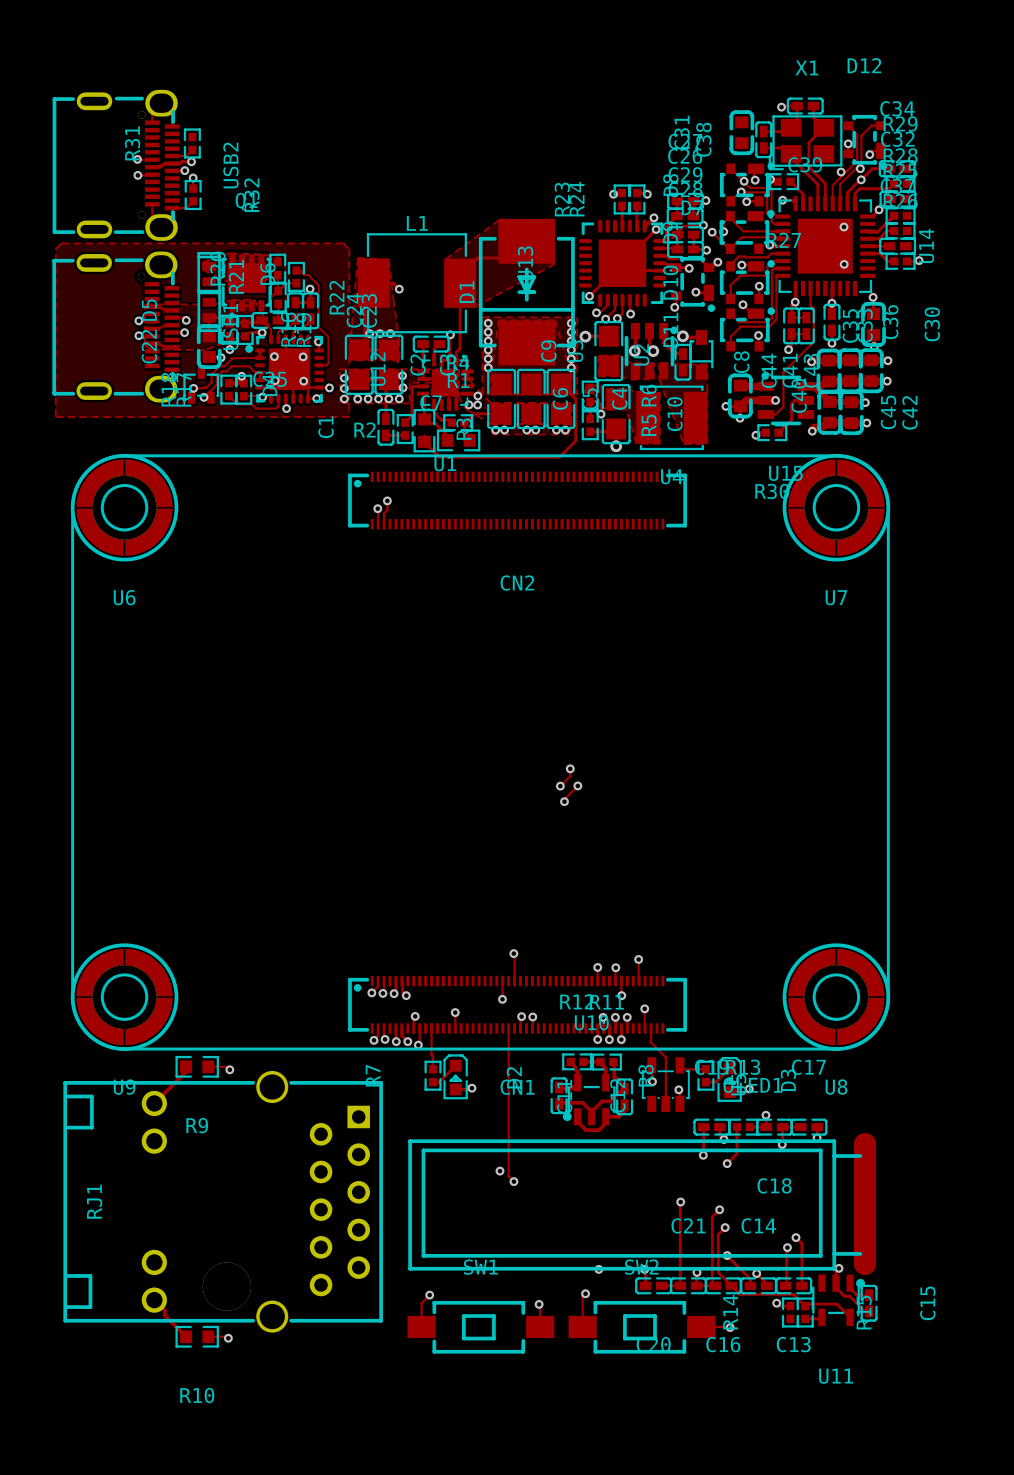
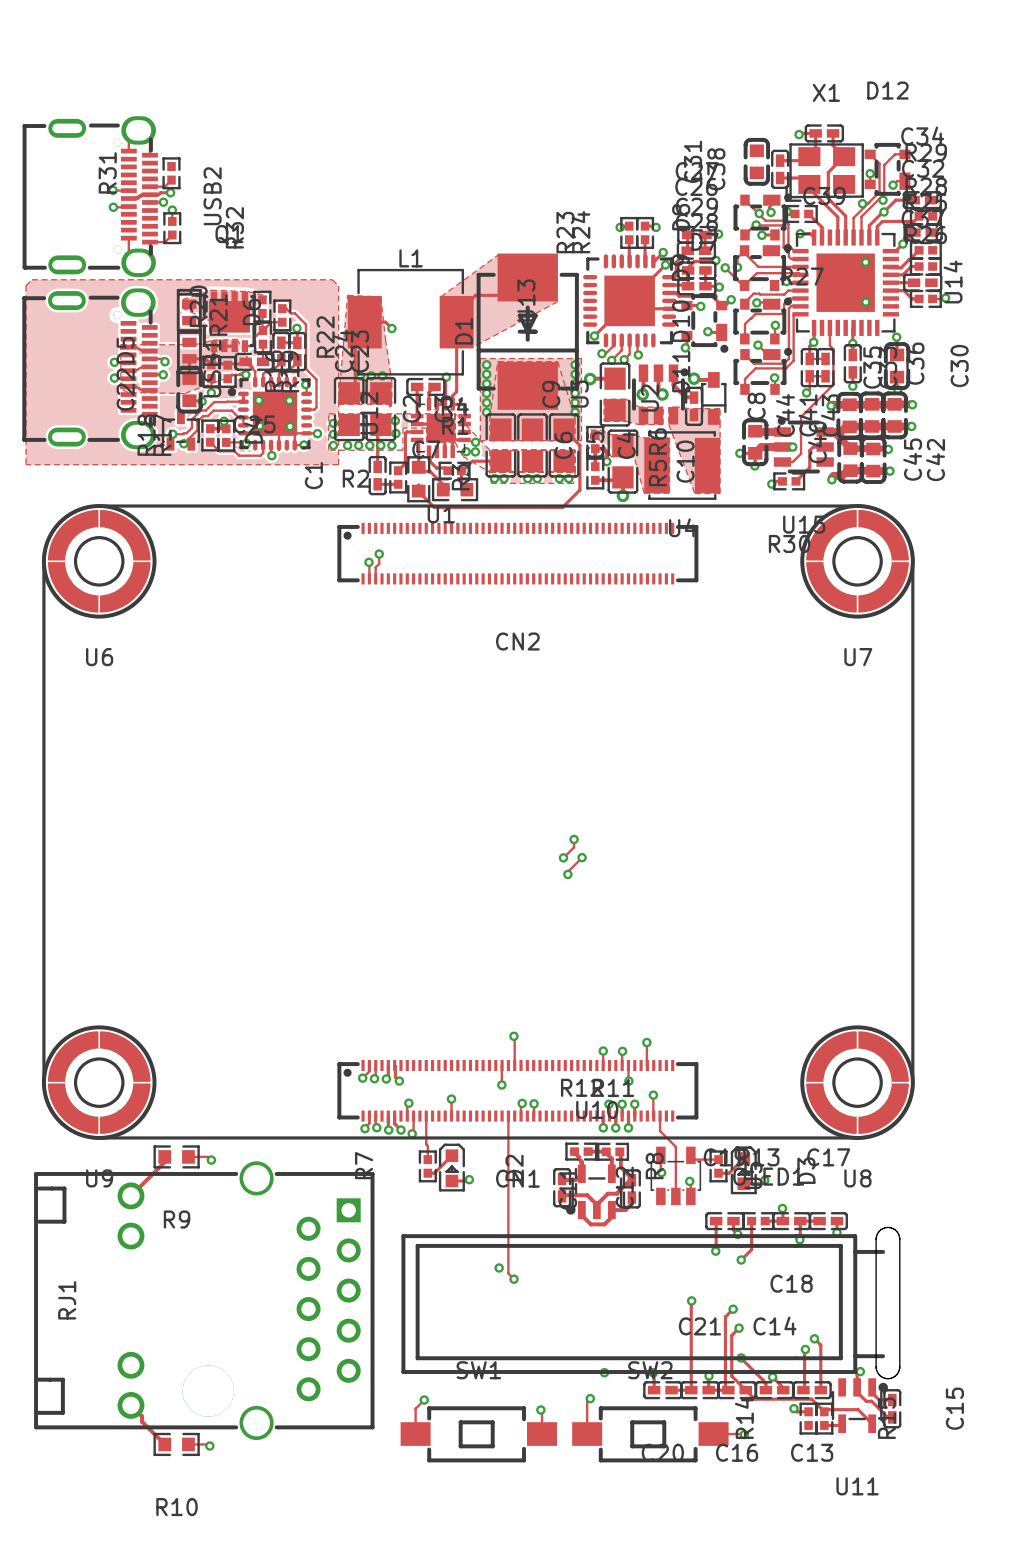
drawing: [853, 1133, 877, 1276] -> none
board edge: none -> (886, 1227) (880, 1230) (876, 1238) (876, 1366) (880, 1376) (889, 1378) (897, 1374) (899, 1368) (899, 1239) (895, 1230) (886, 1227)

